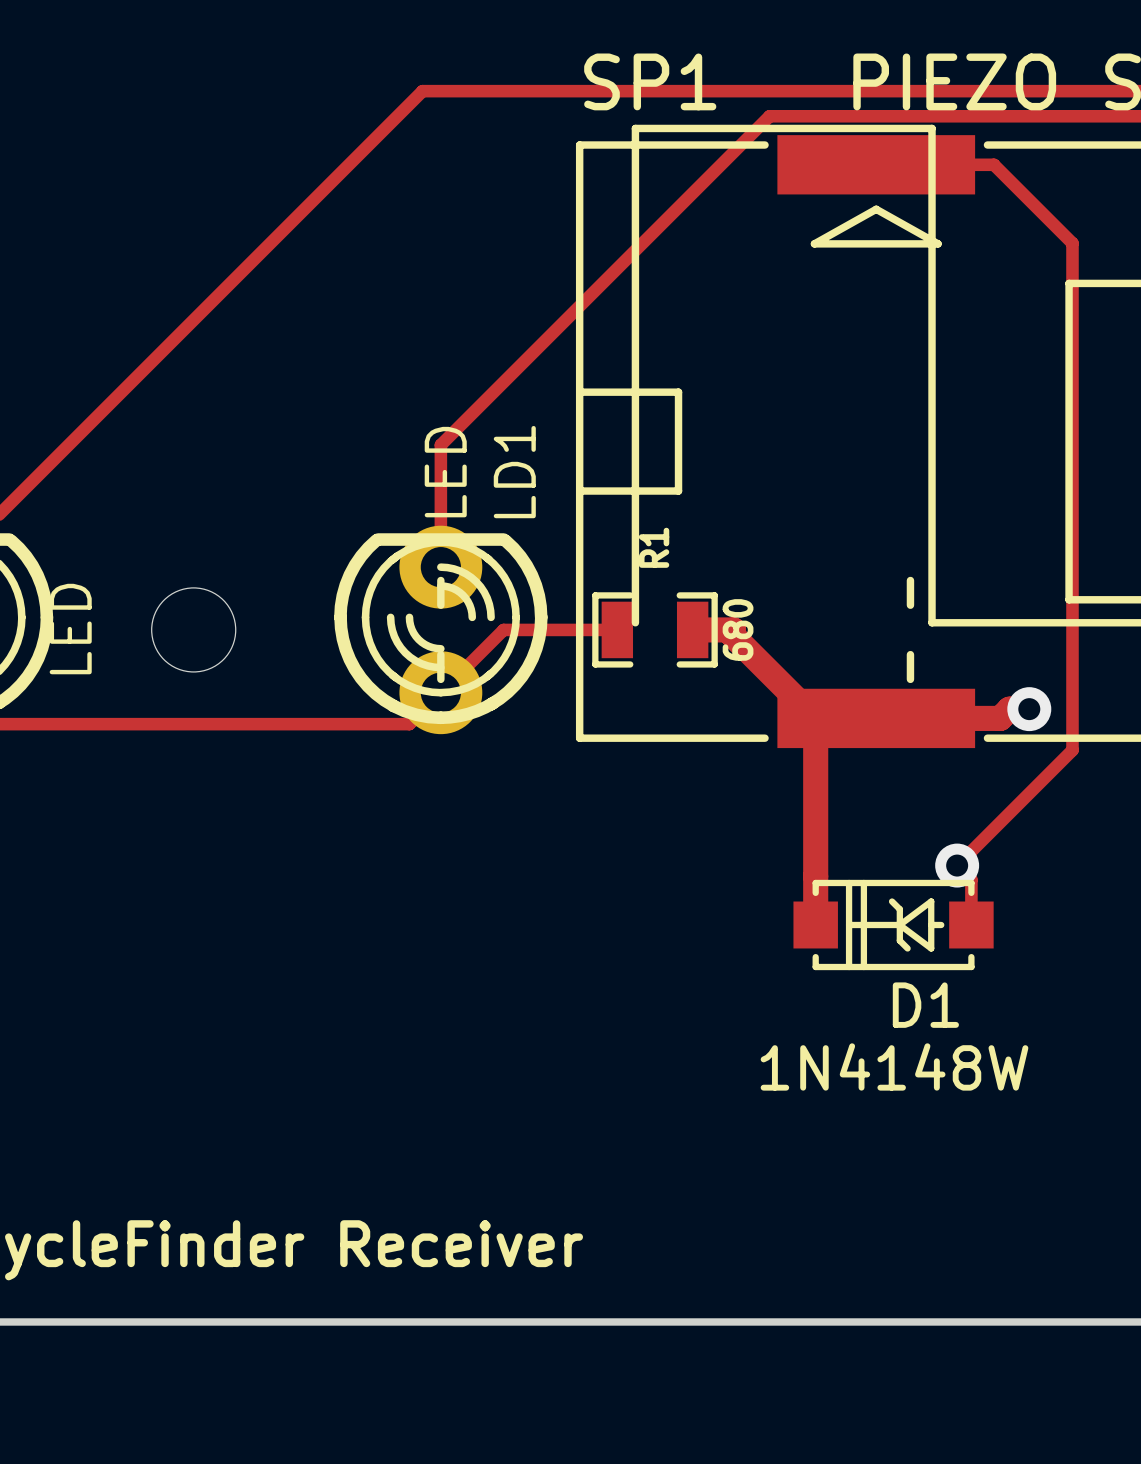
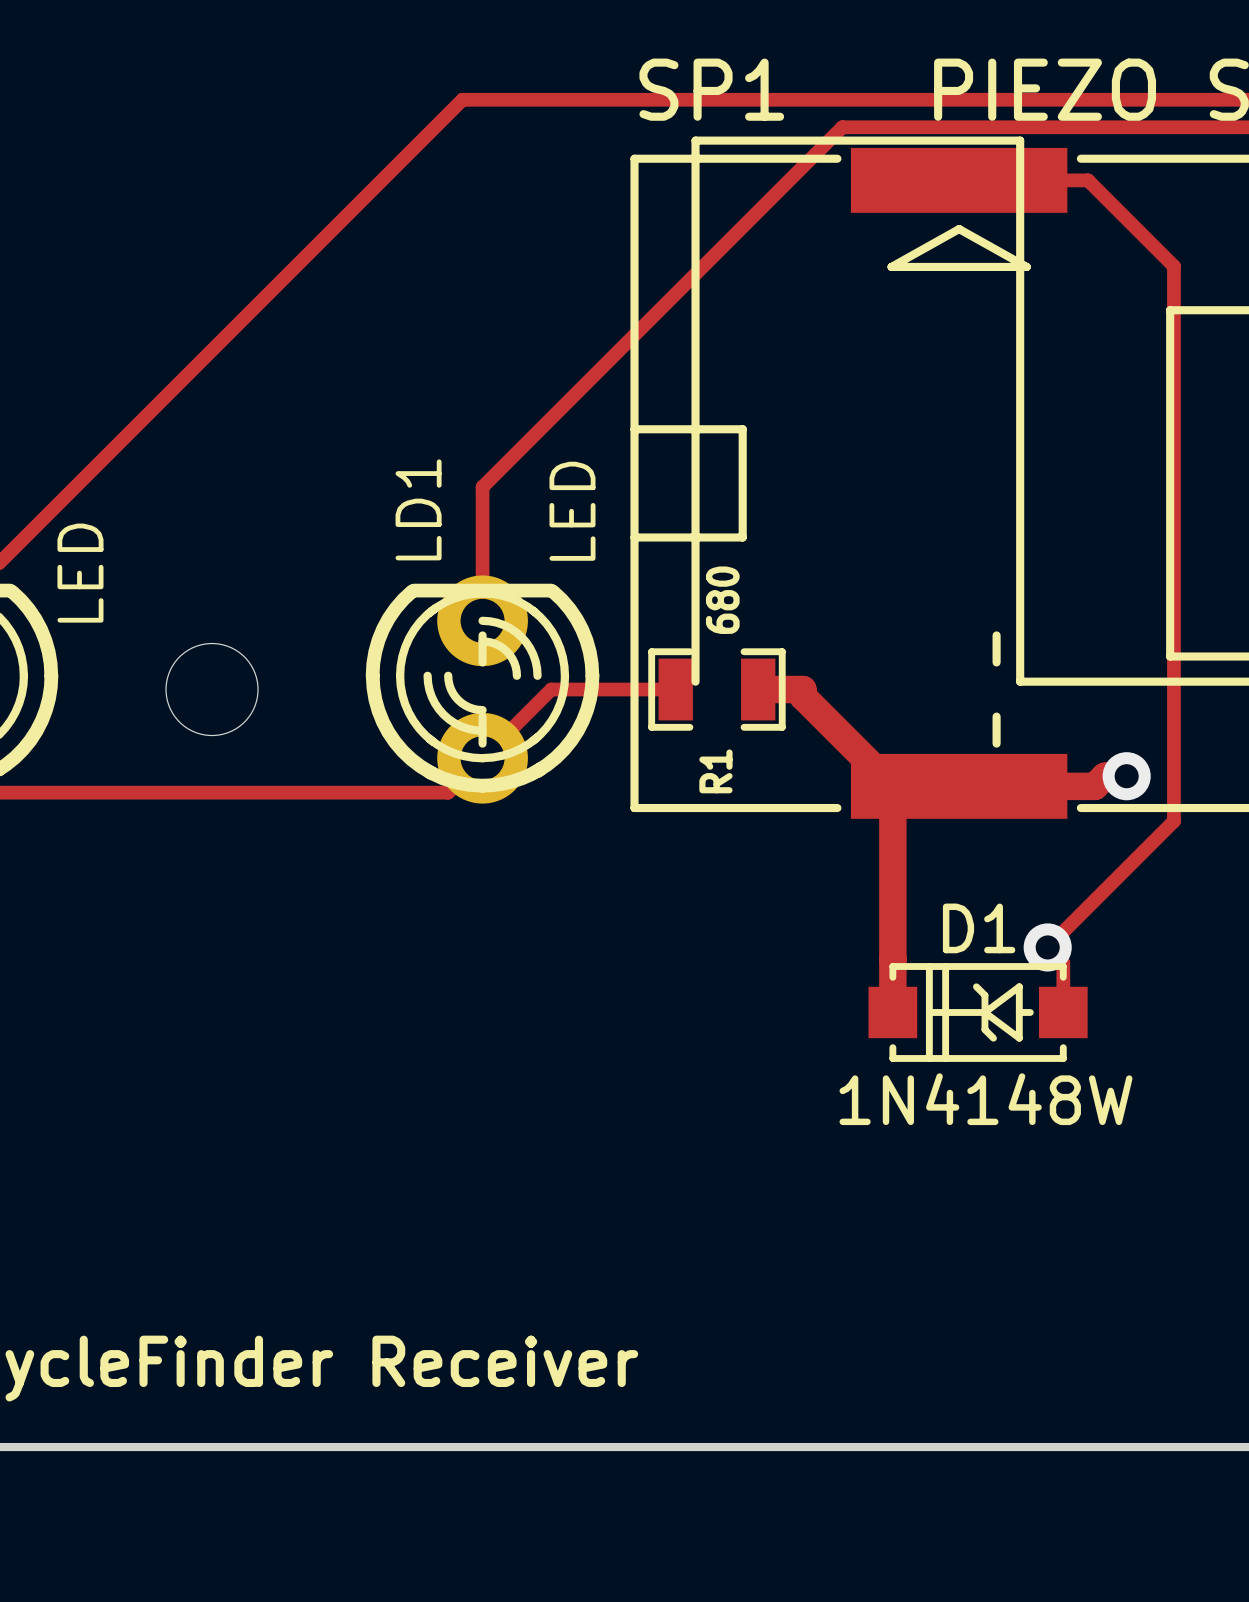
LD1 value position: LED (445, 472) -> LED (572, 511)
LD1 name position: LD1 (514, 472) -> LD1 (418, 509)
R1 name position: R1 (654, 547) -> R1 (715, 771)
part value position: LED (70, 629) -> LED (80, 573)
R1 value position: 680 (738, 629) -> 680 (722, 600)
D1 name position: D1 (925, 1005) -> D1 (979, 928)
D1 value position: 1N4148W (894, 1066) -> 1N4148W (985, 1099)

